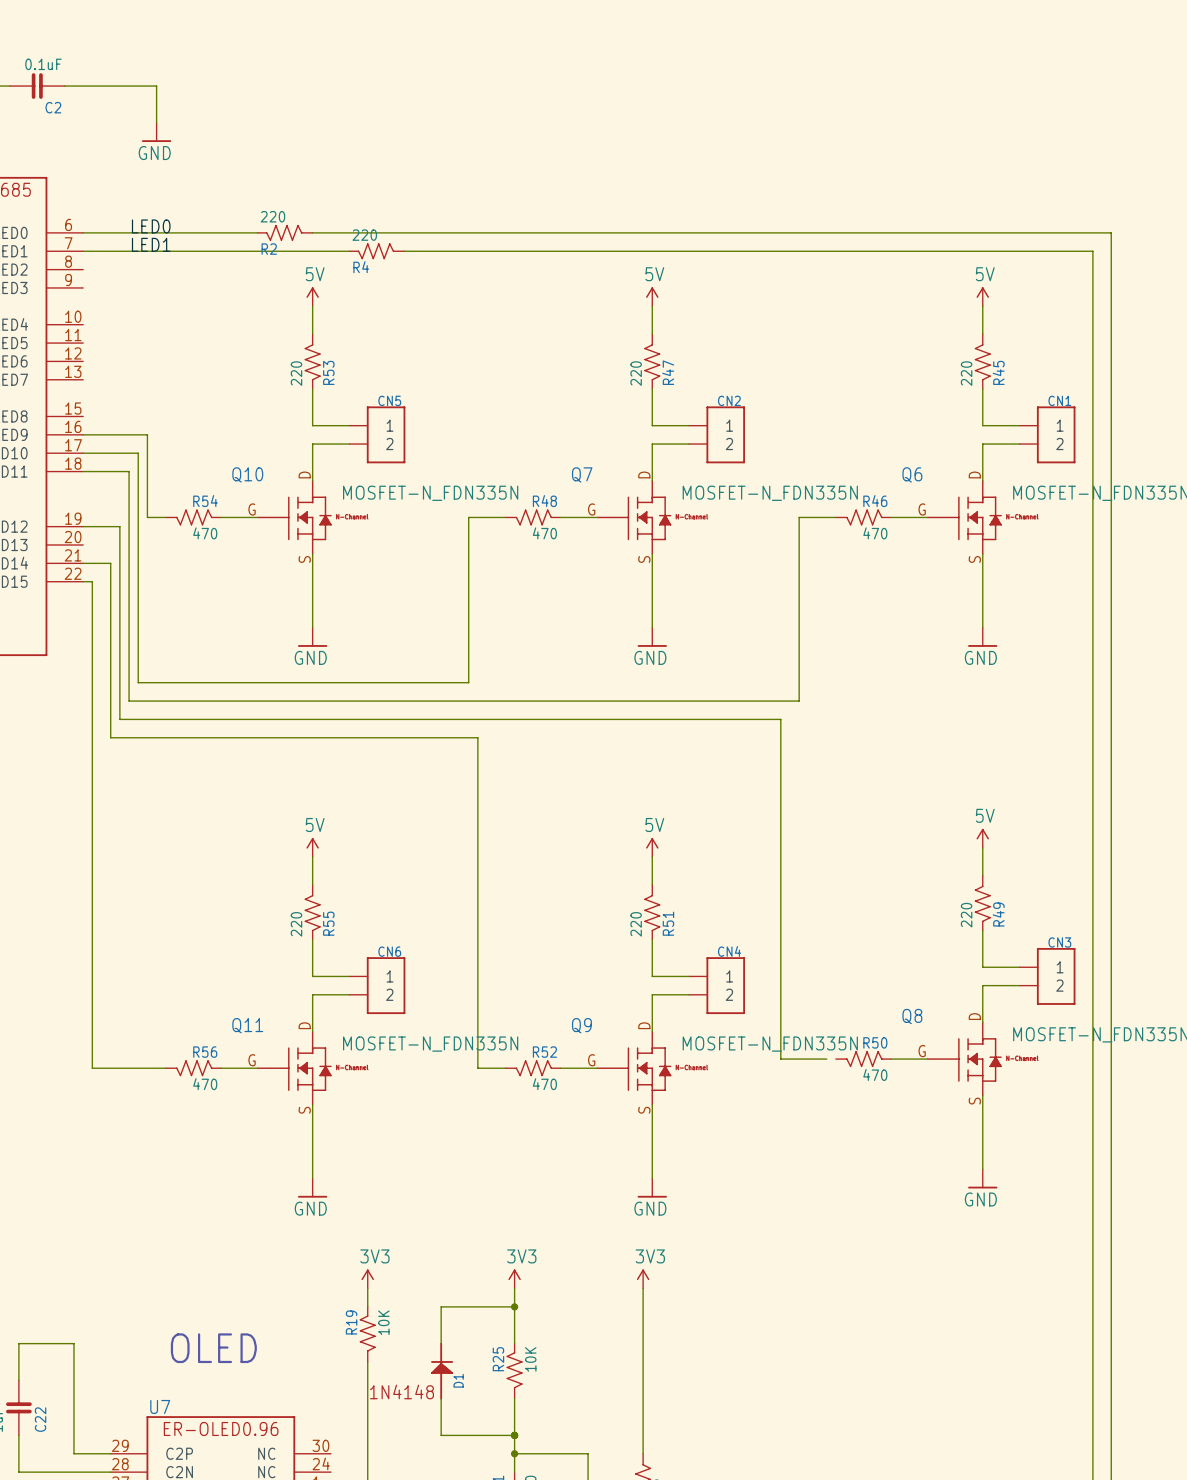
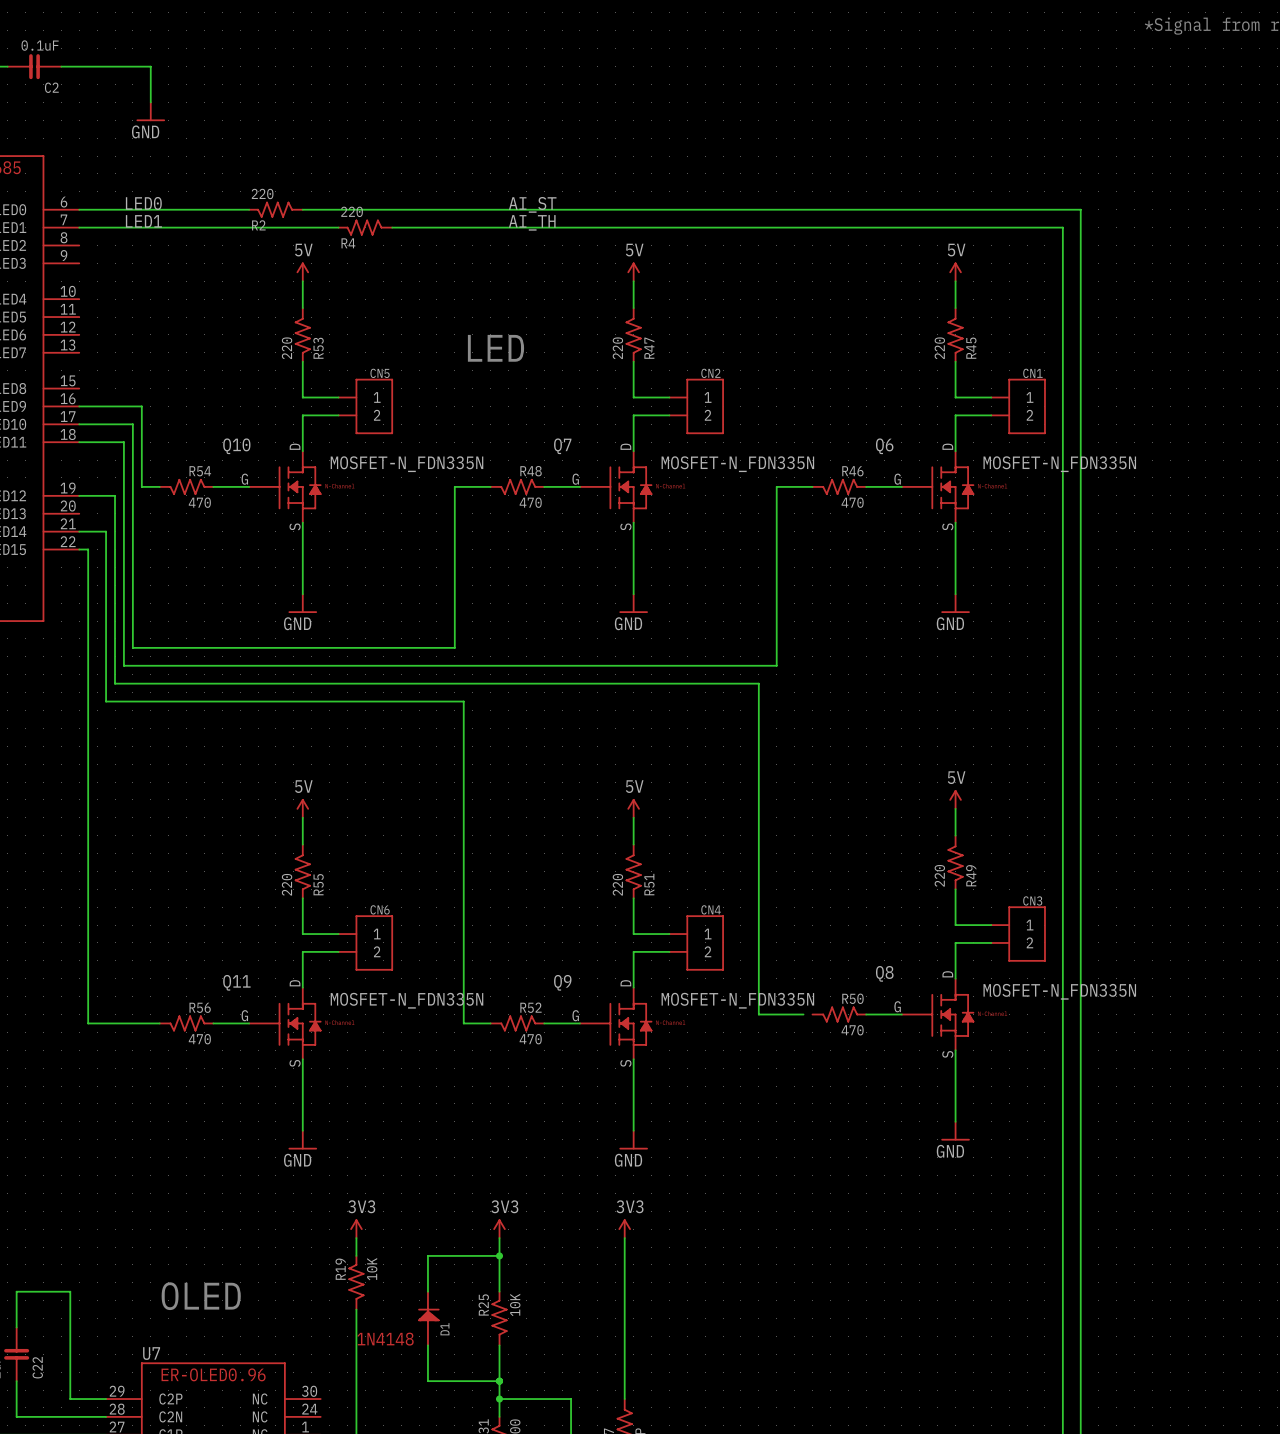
label: none -> AI_ST (532, 204)
label: none -> AI_TH (532, 222)
text: none -> LED (495, 348)

